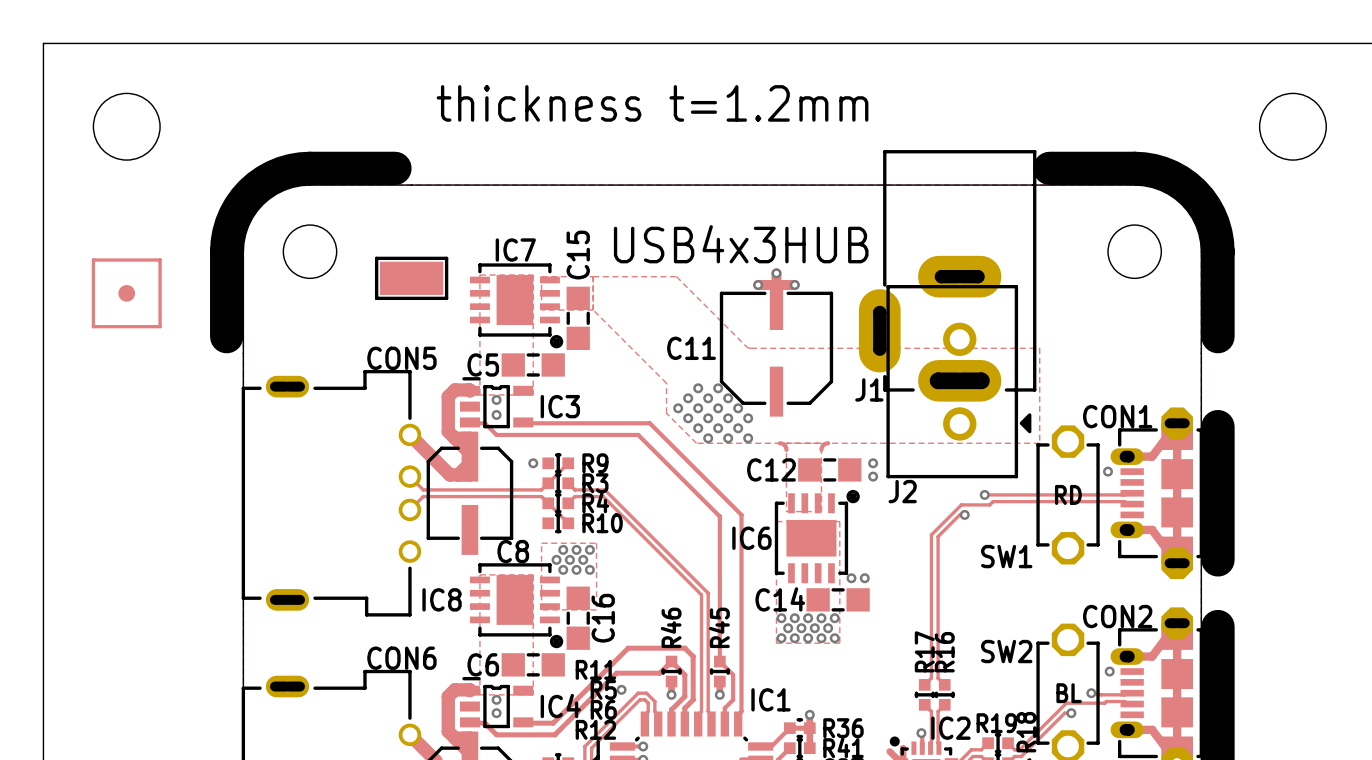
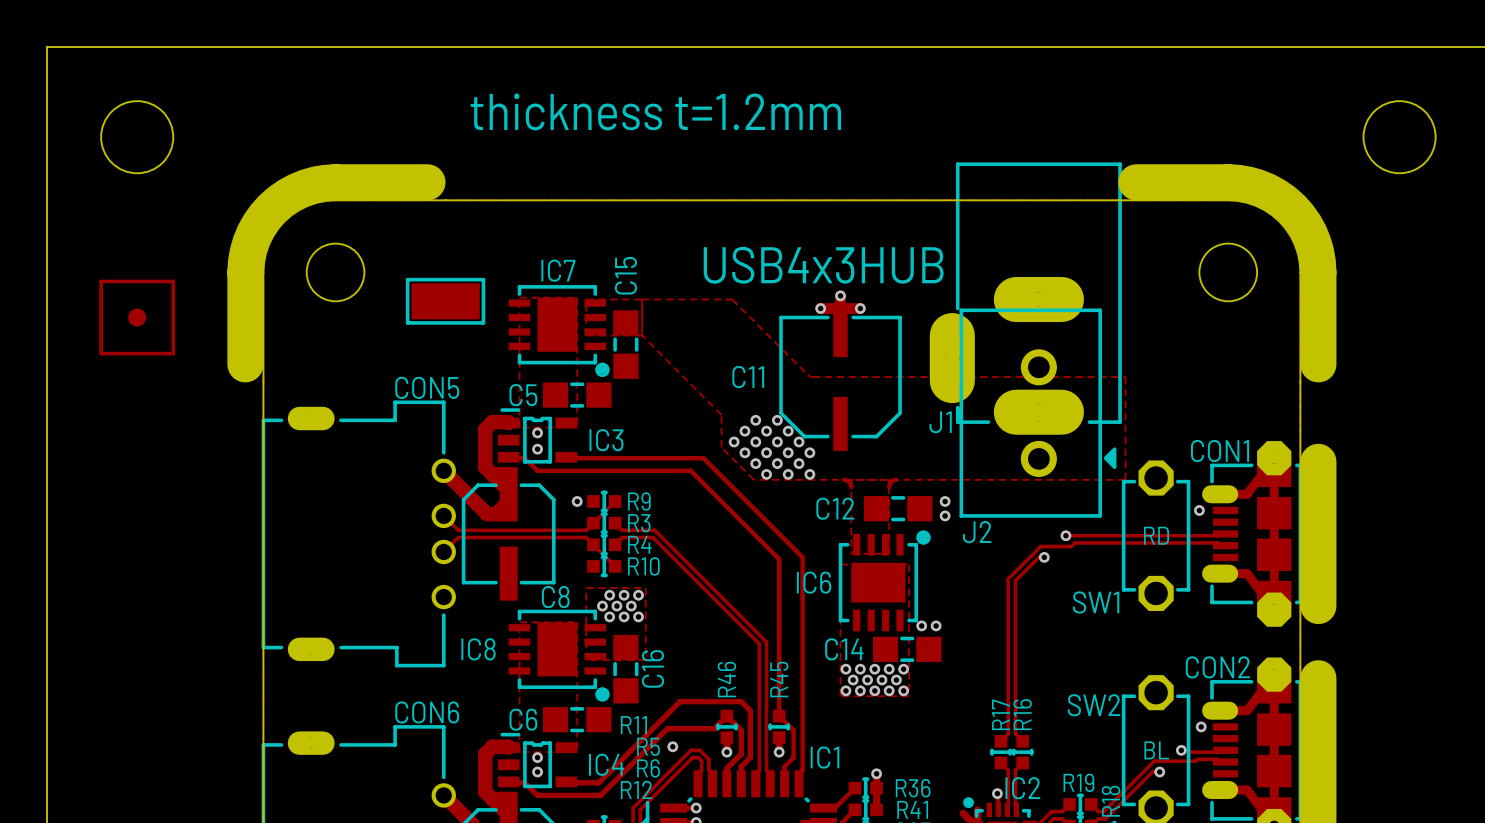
R36 footprint: [783, 718, 816, 739] -> [848, 777, 883, 800]

